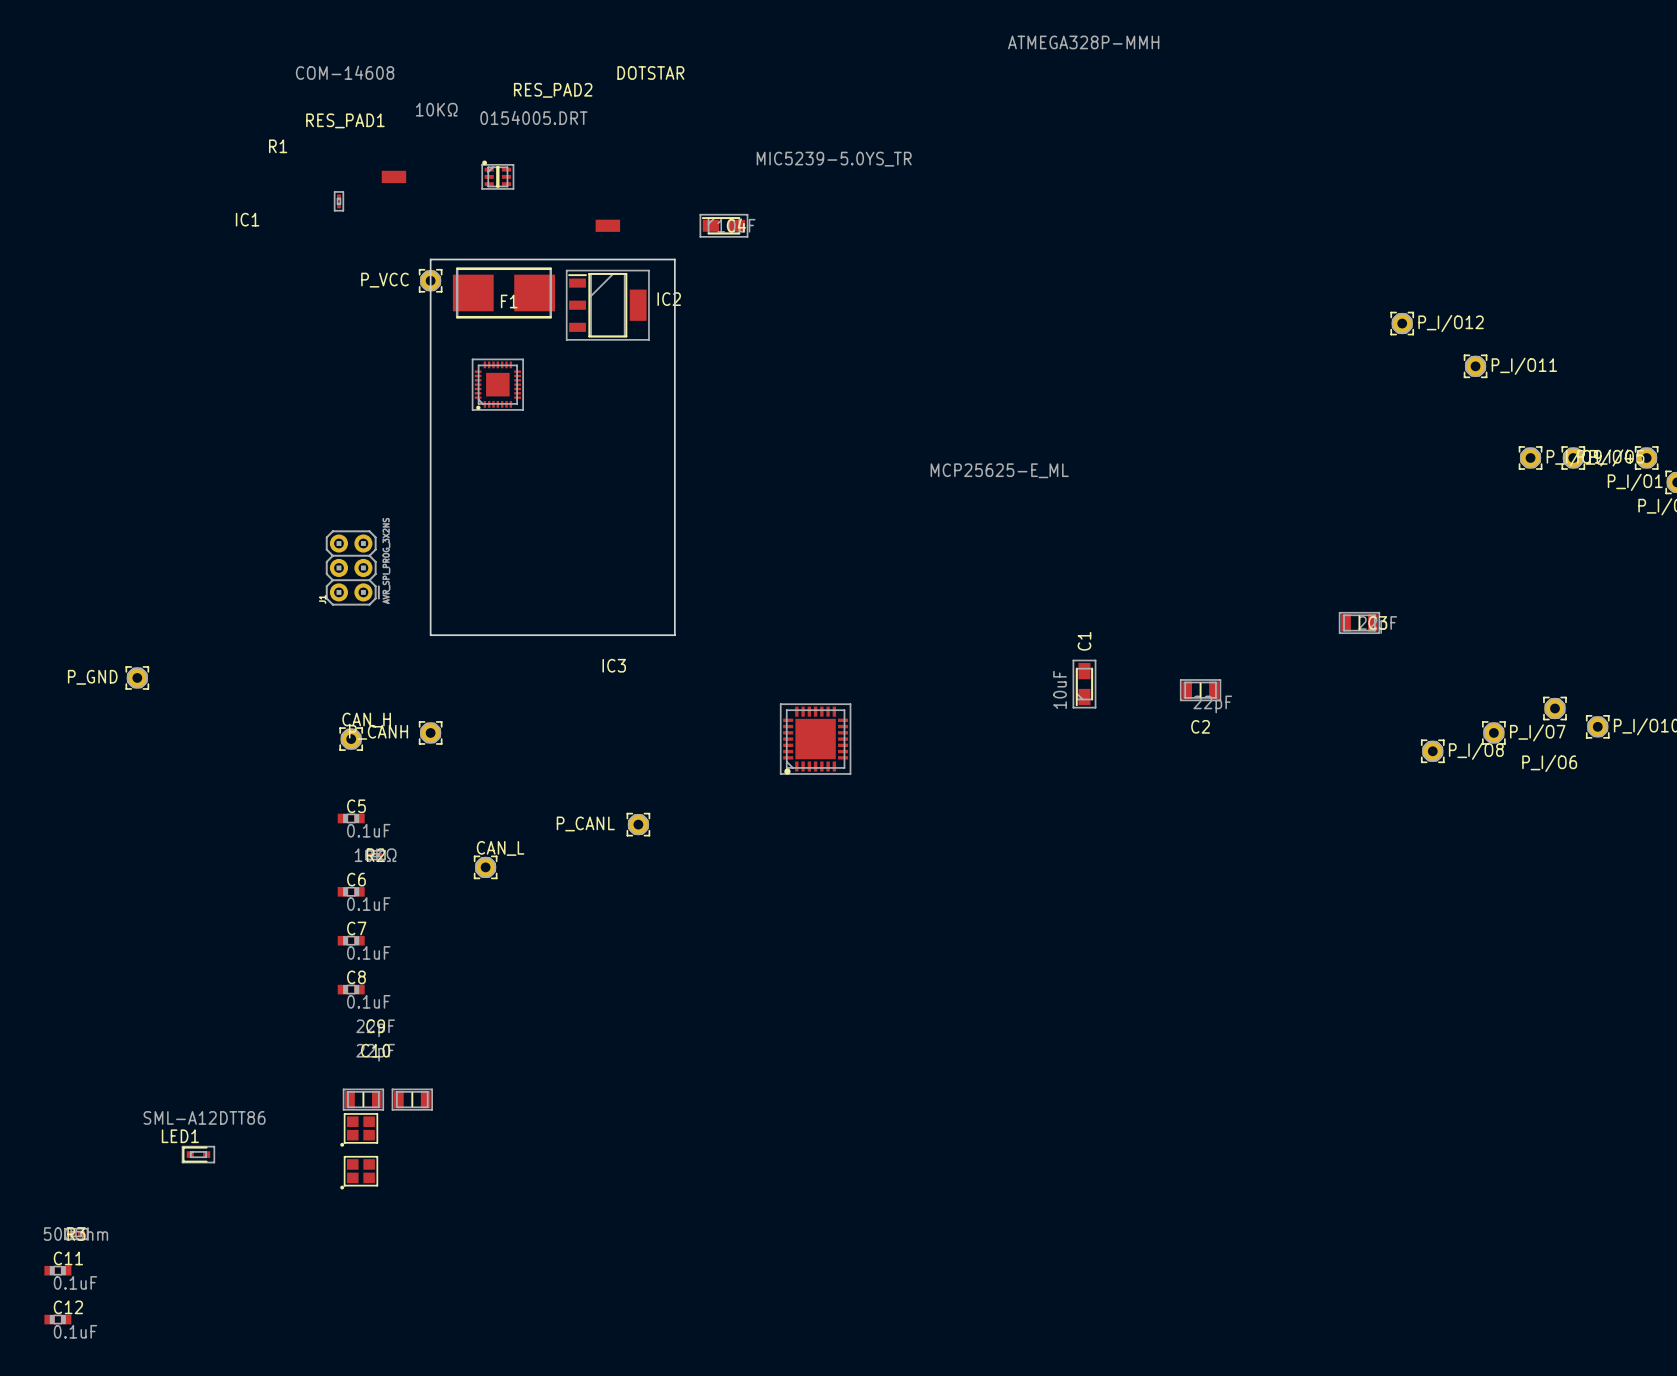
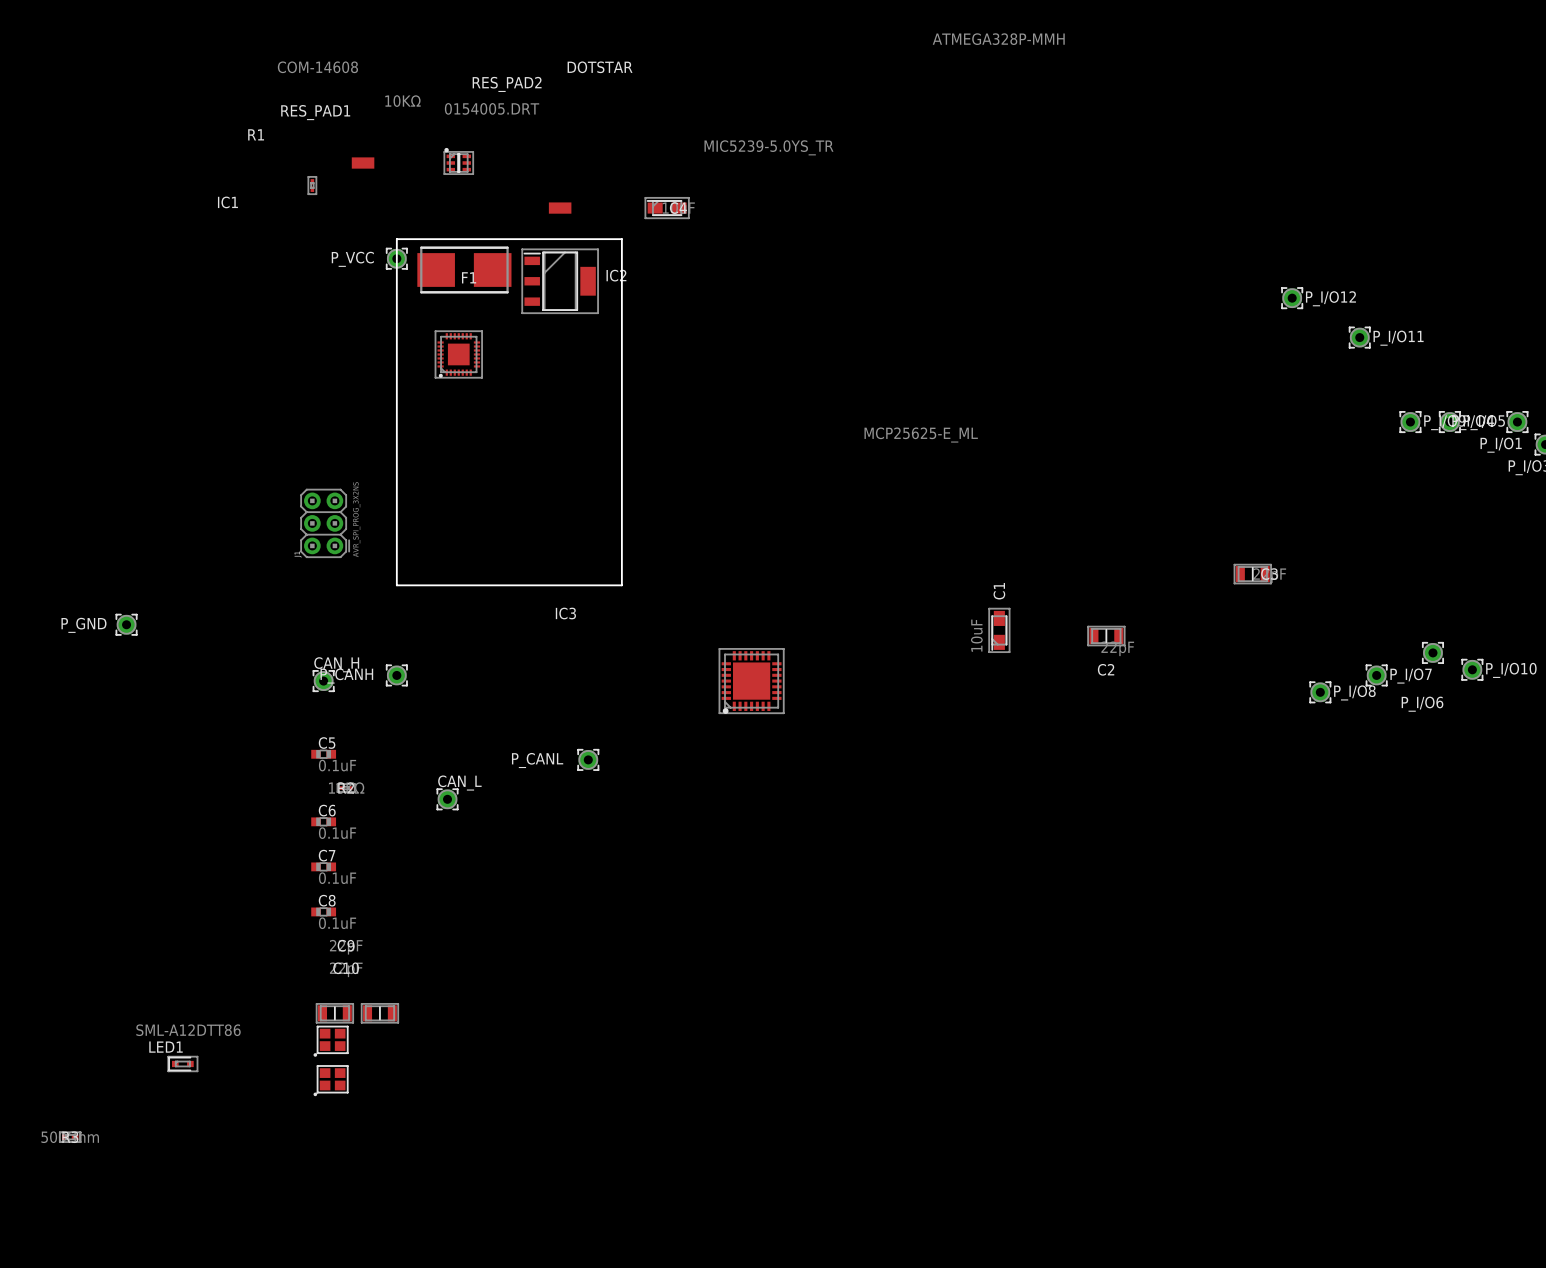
C11: 0.1uF (57, 1270) -> none
C12: 0.1uF (57, 1319) -> none

